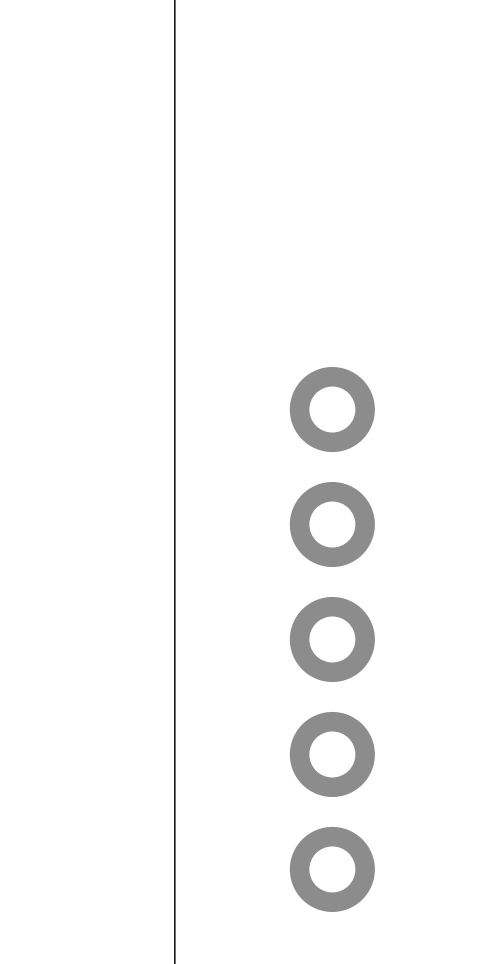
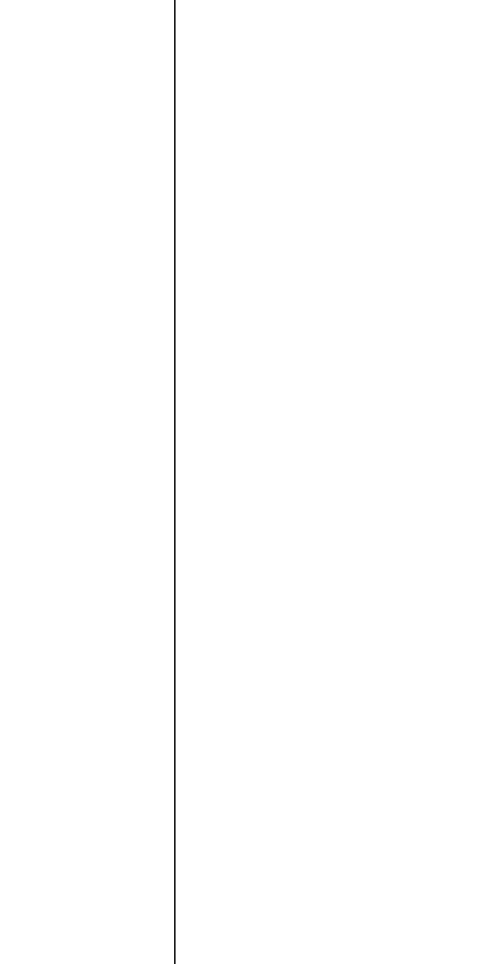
part: (332, 639) -> none

